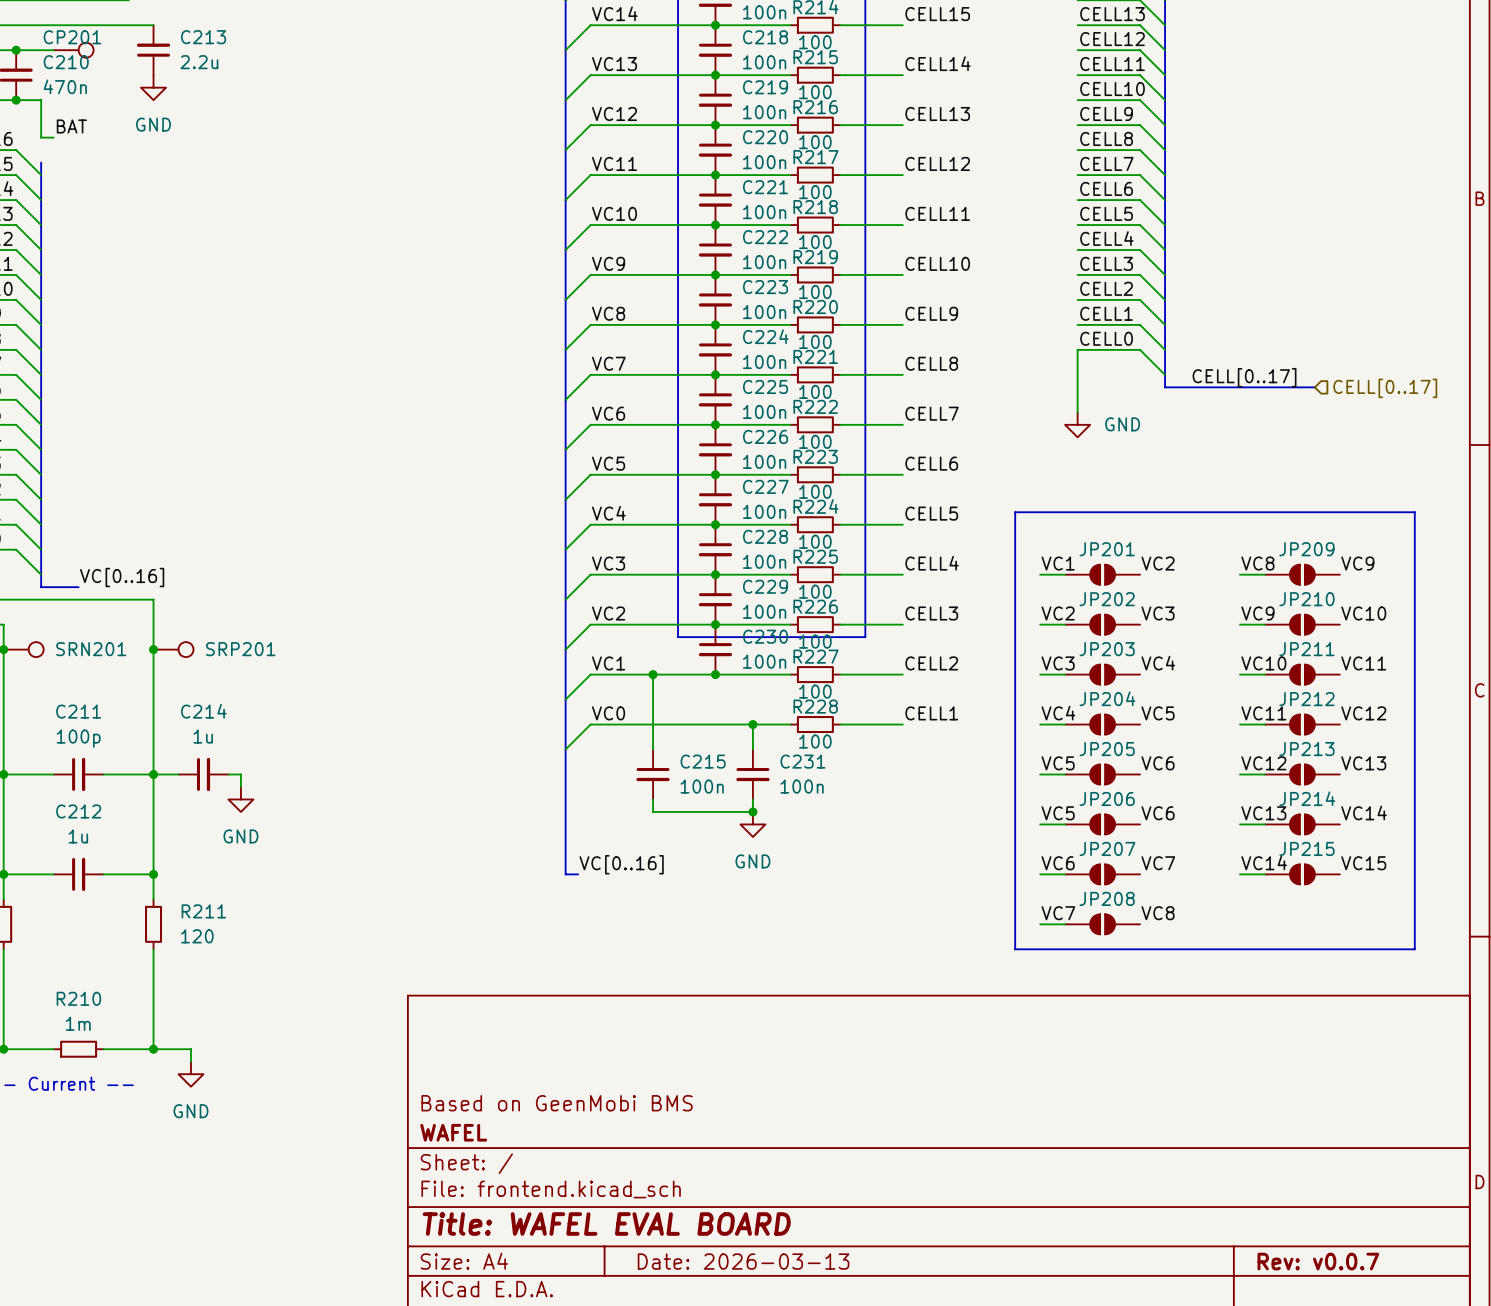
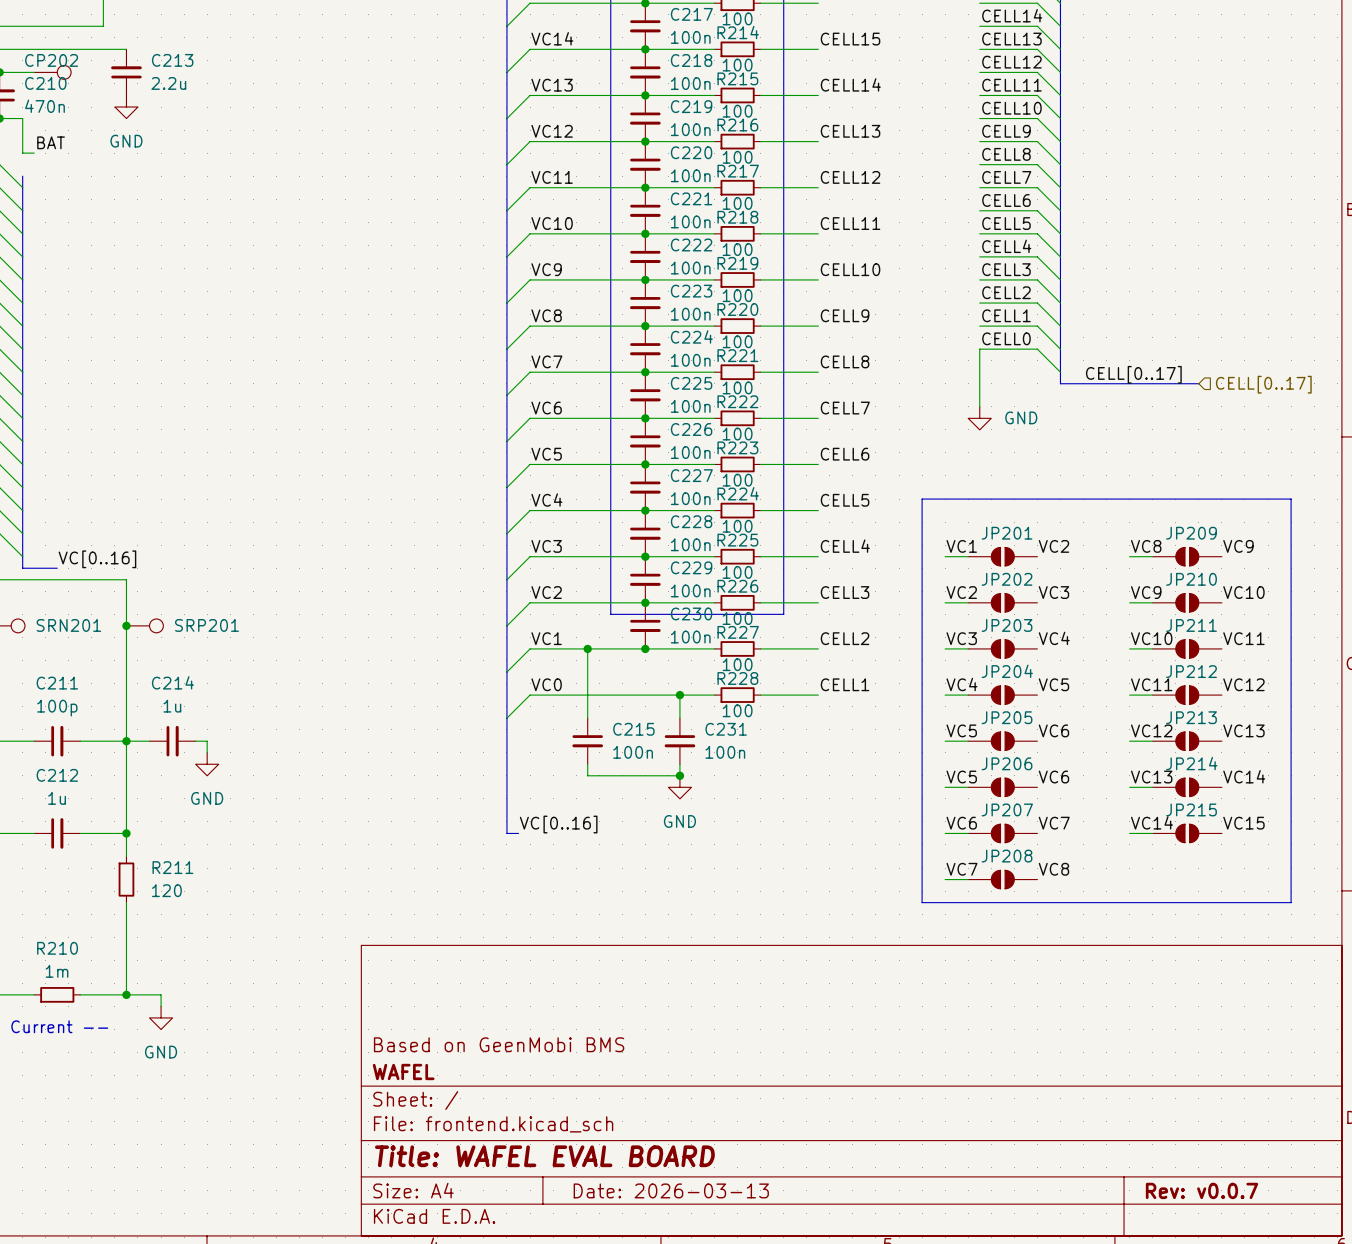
CP201 name: CP201 (72, 37) -> CP202 (51, 60)

